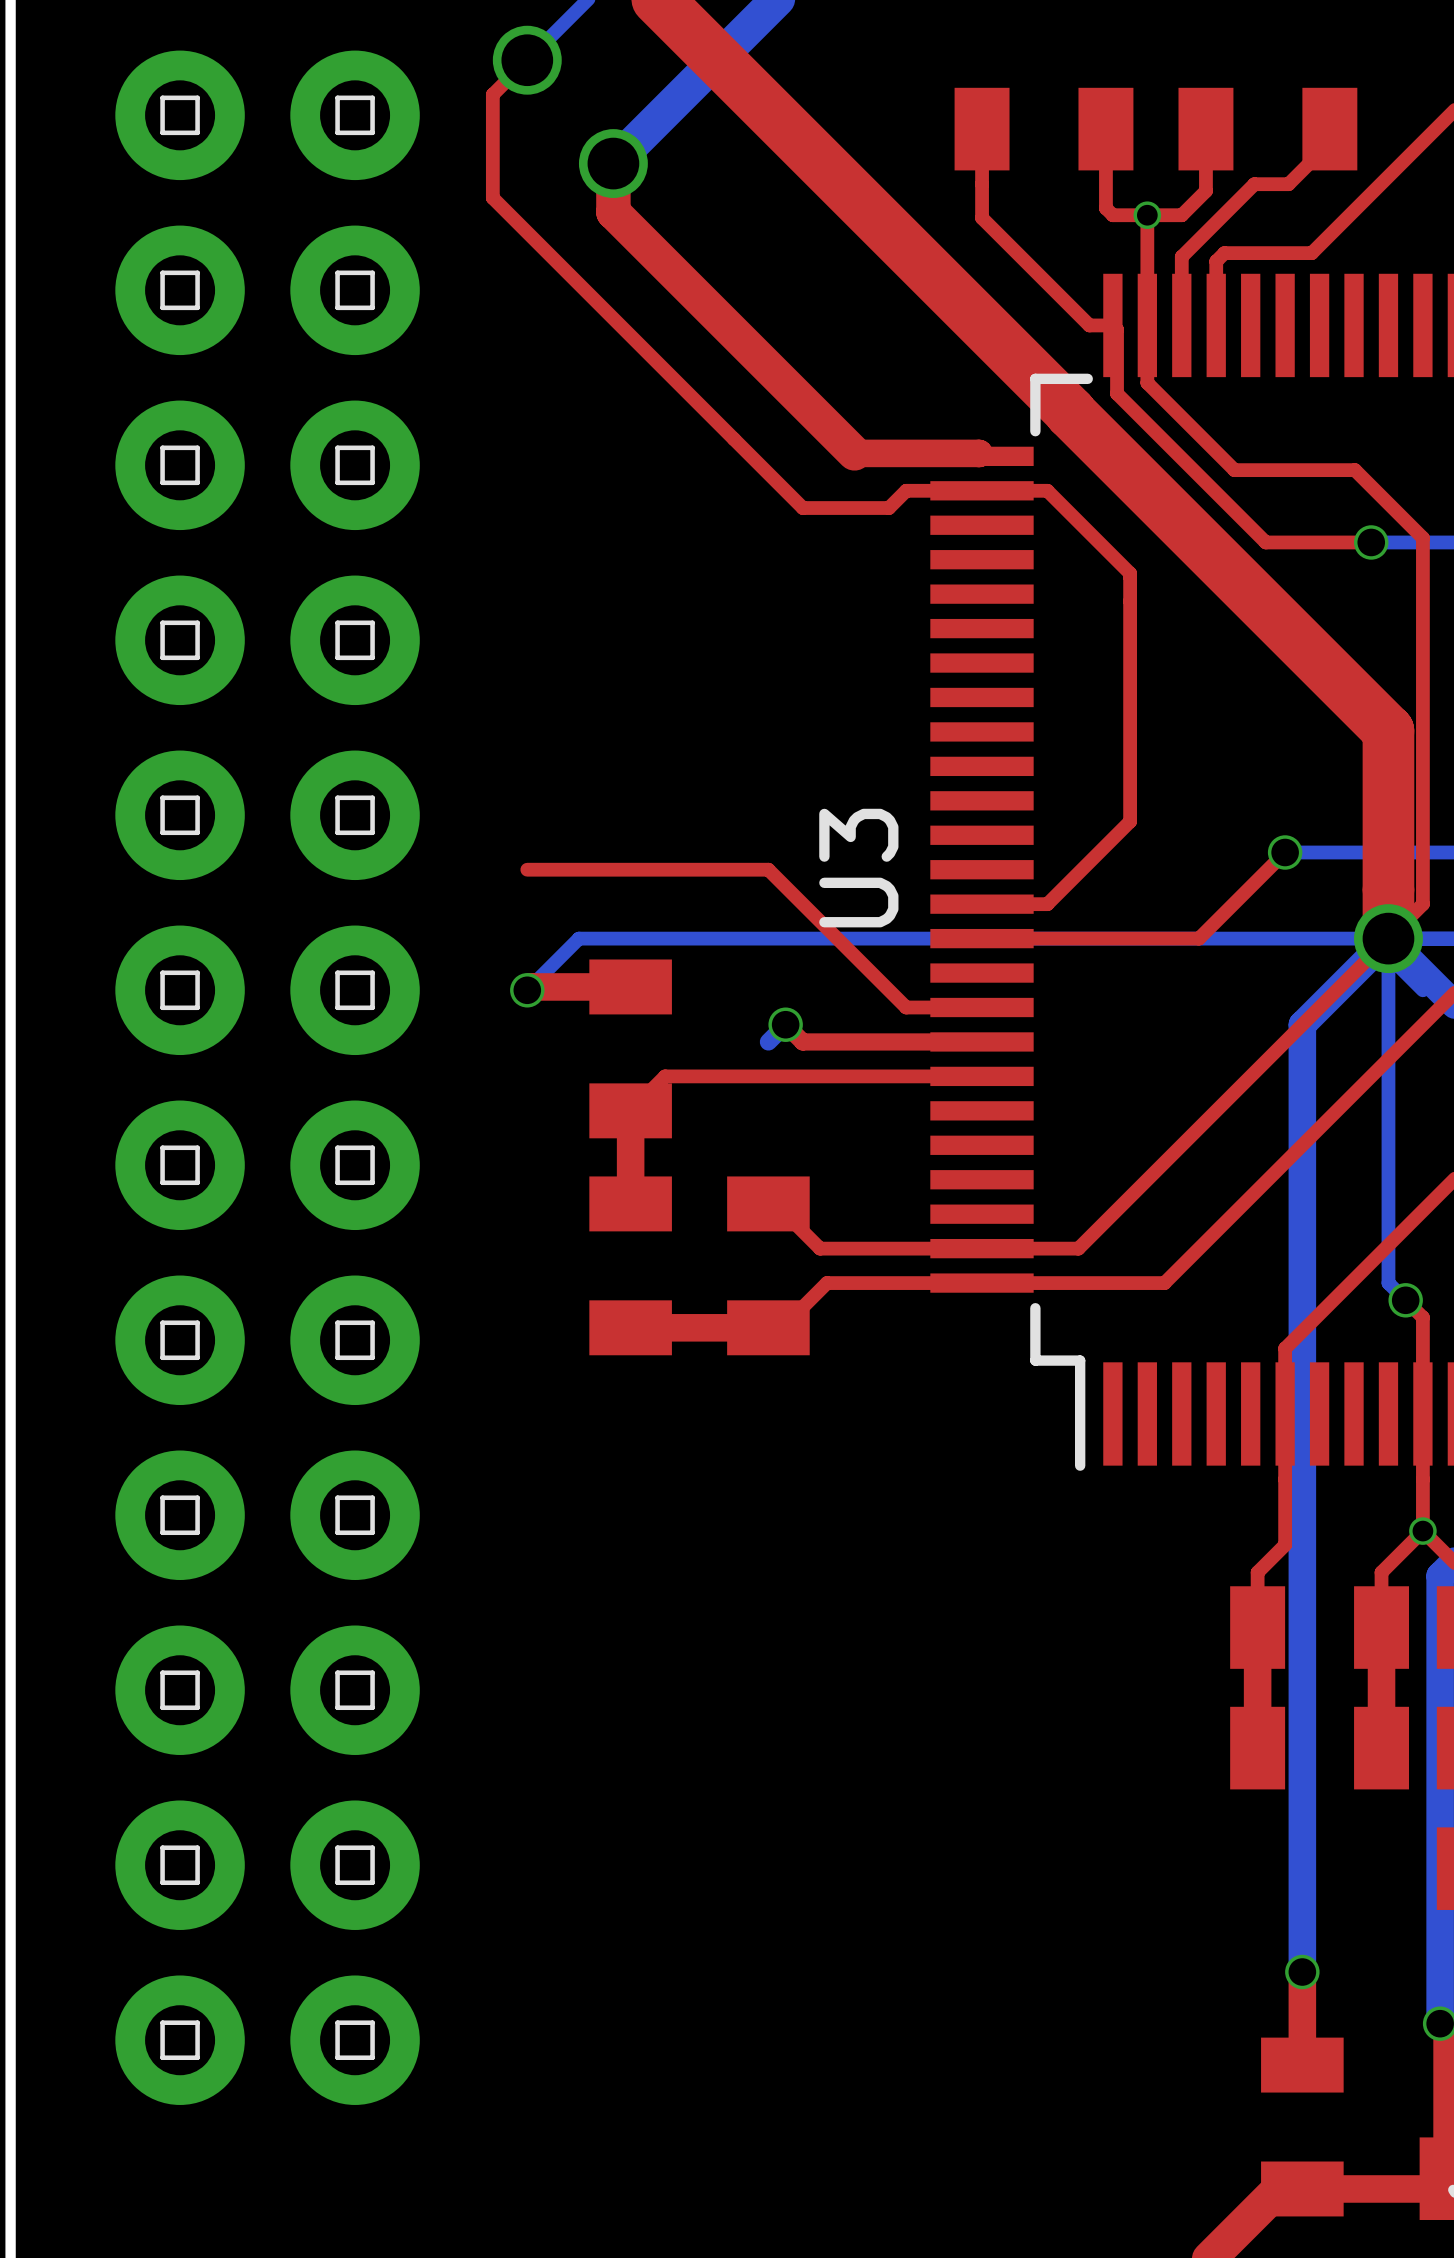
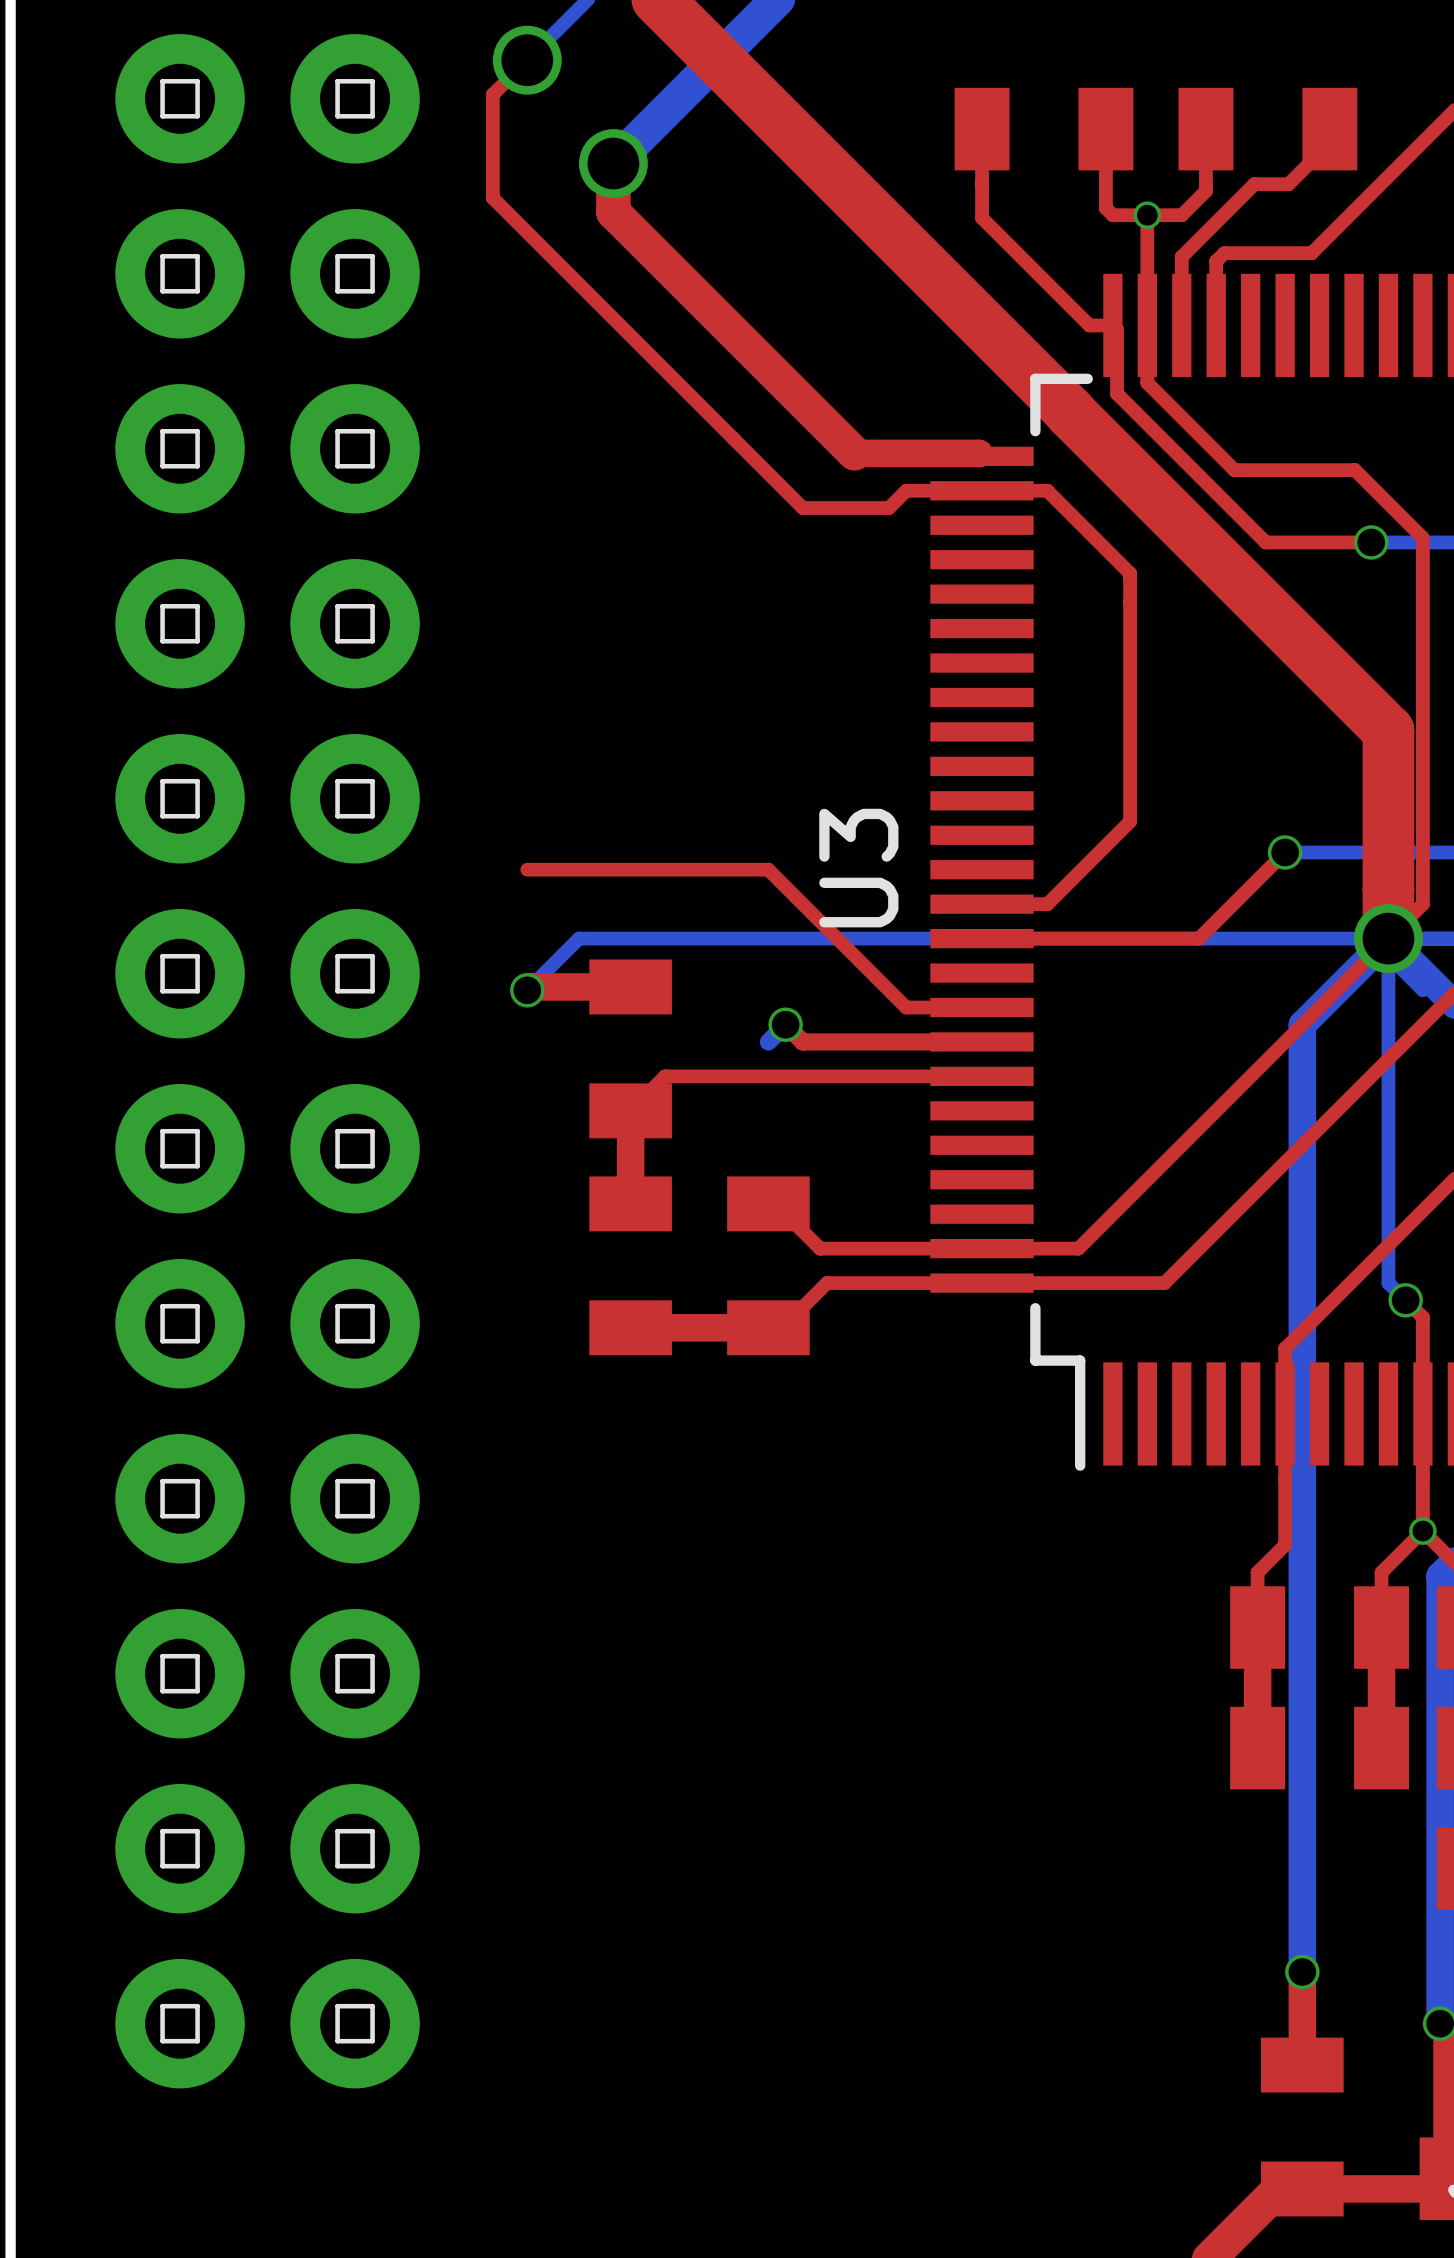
part position: (267, 1077) -> (267, 1061)

